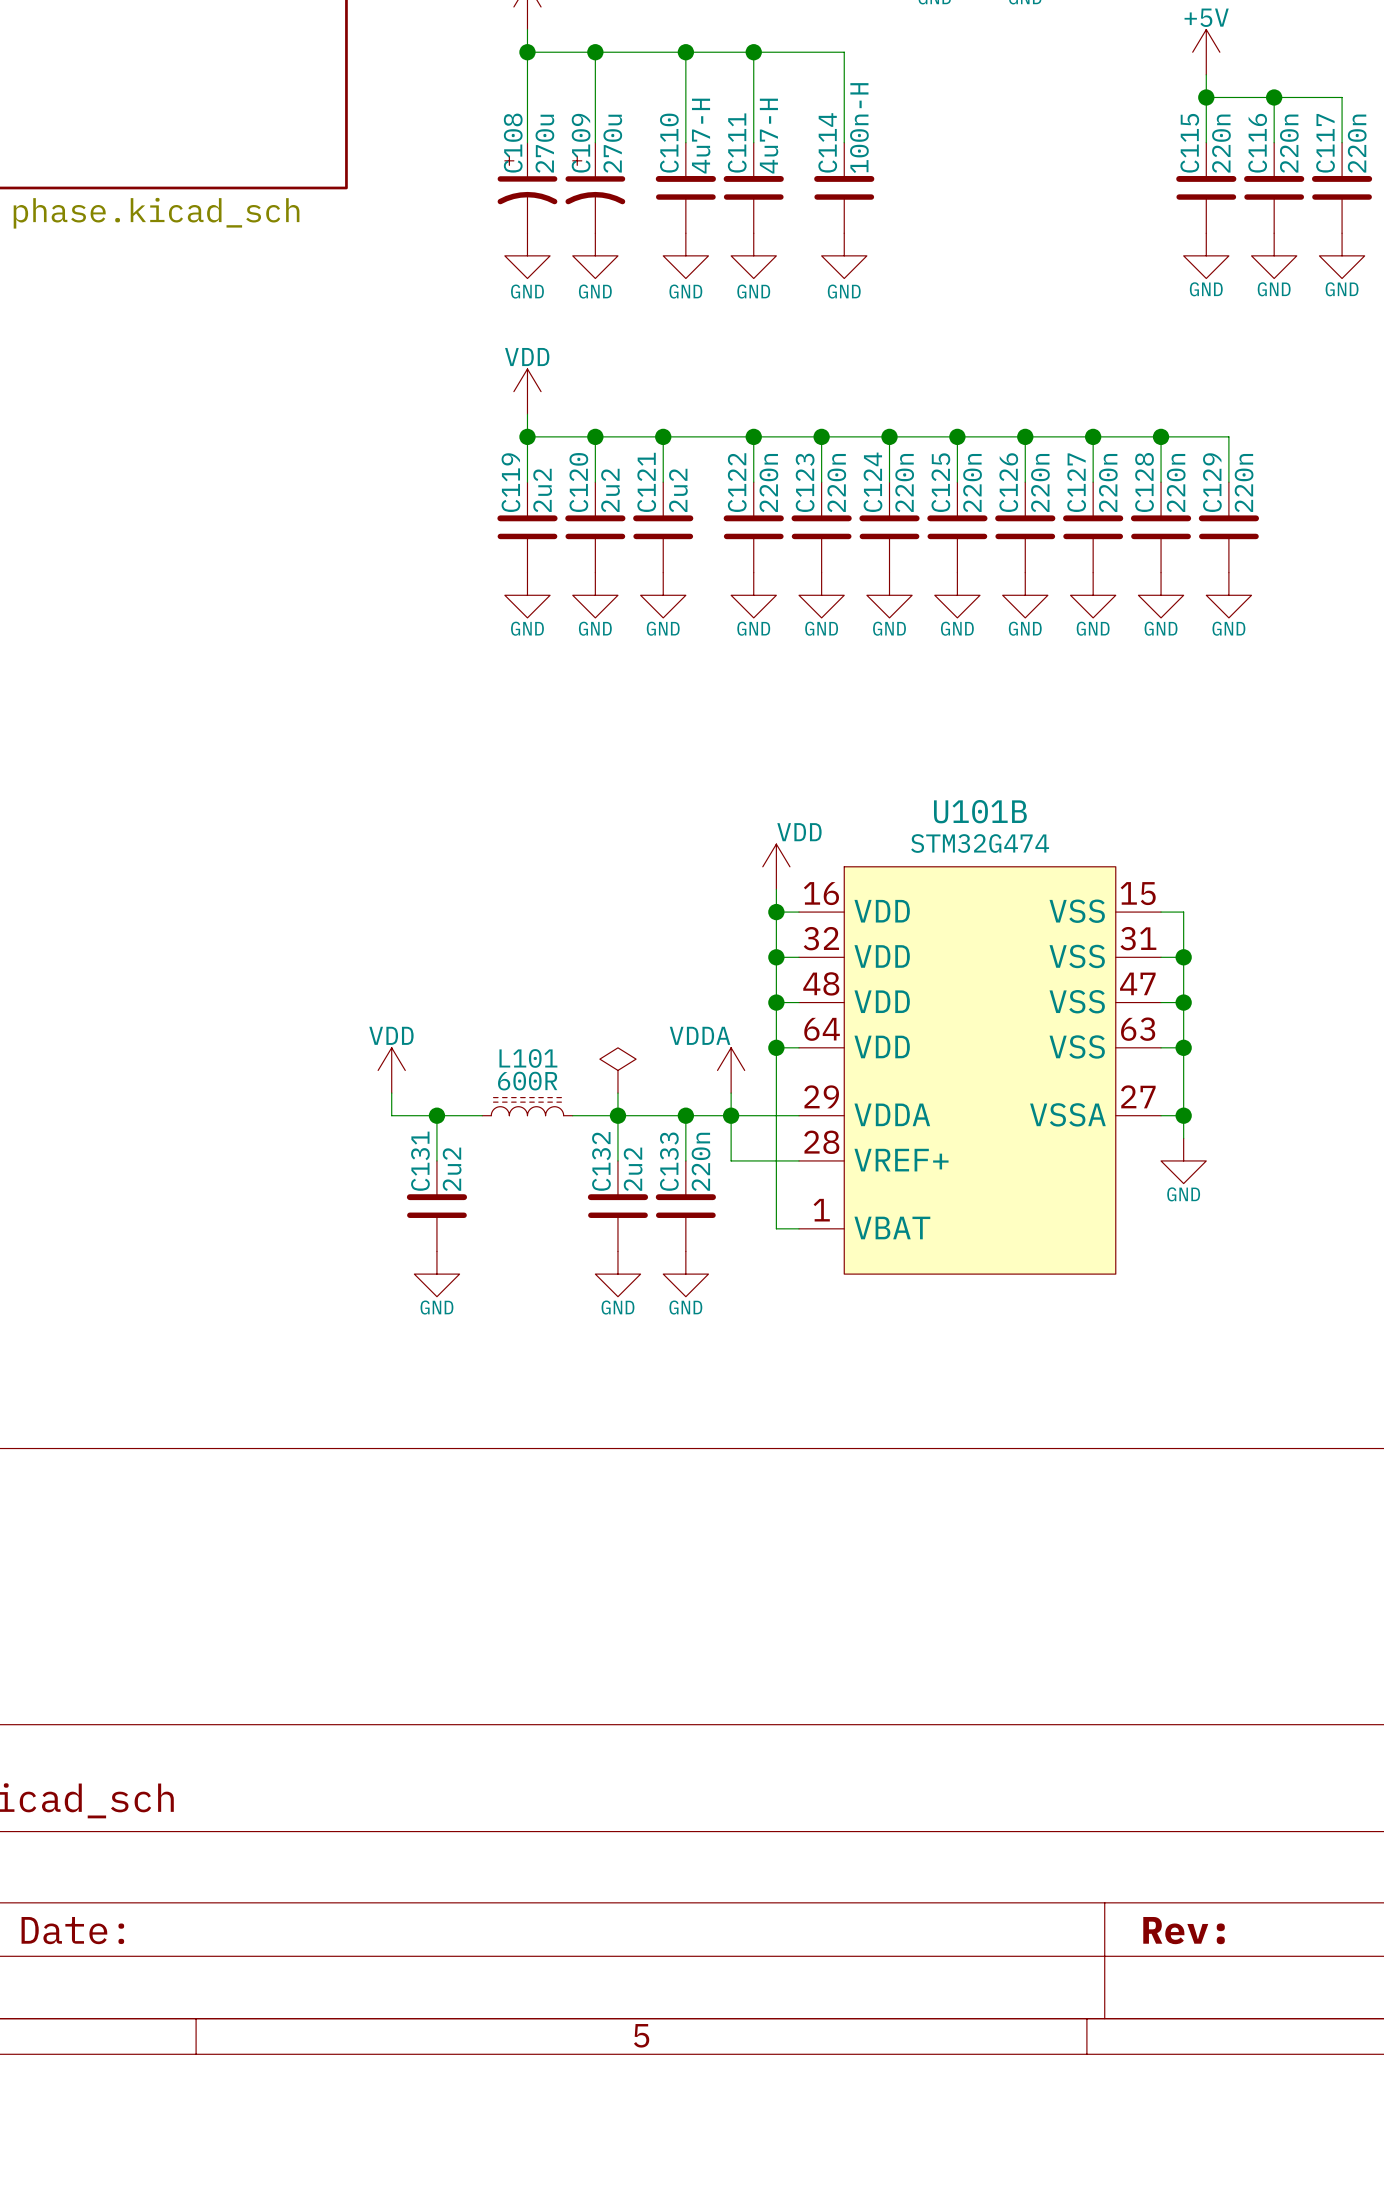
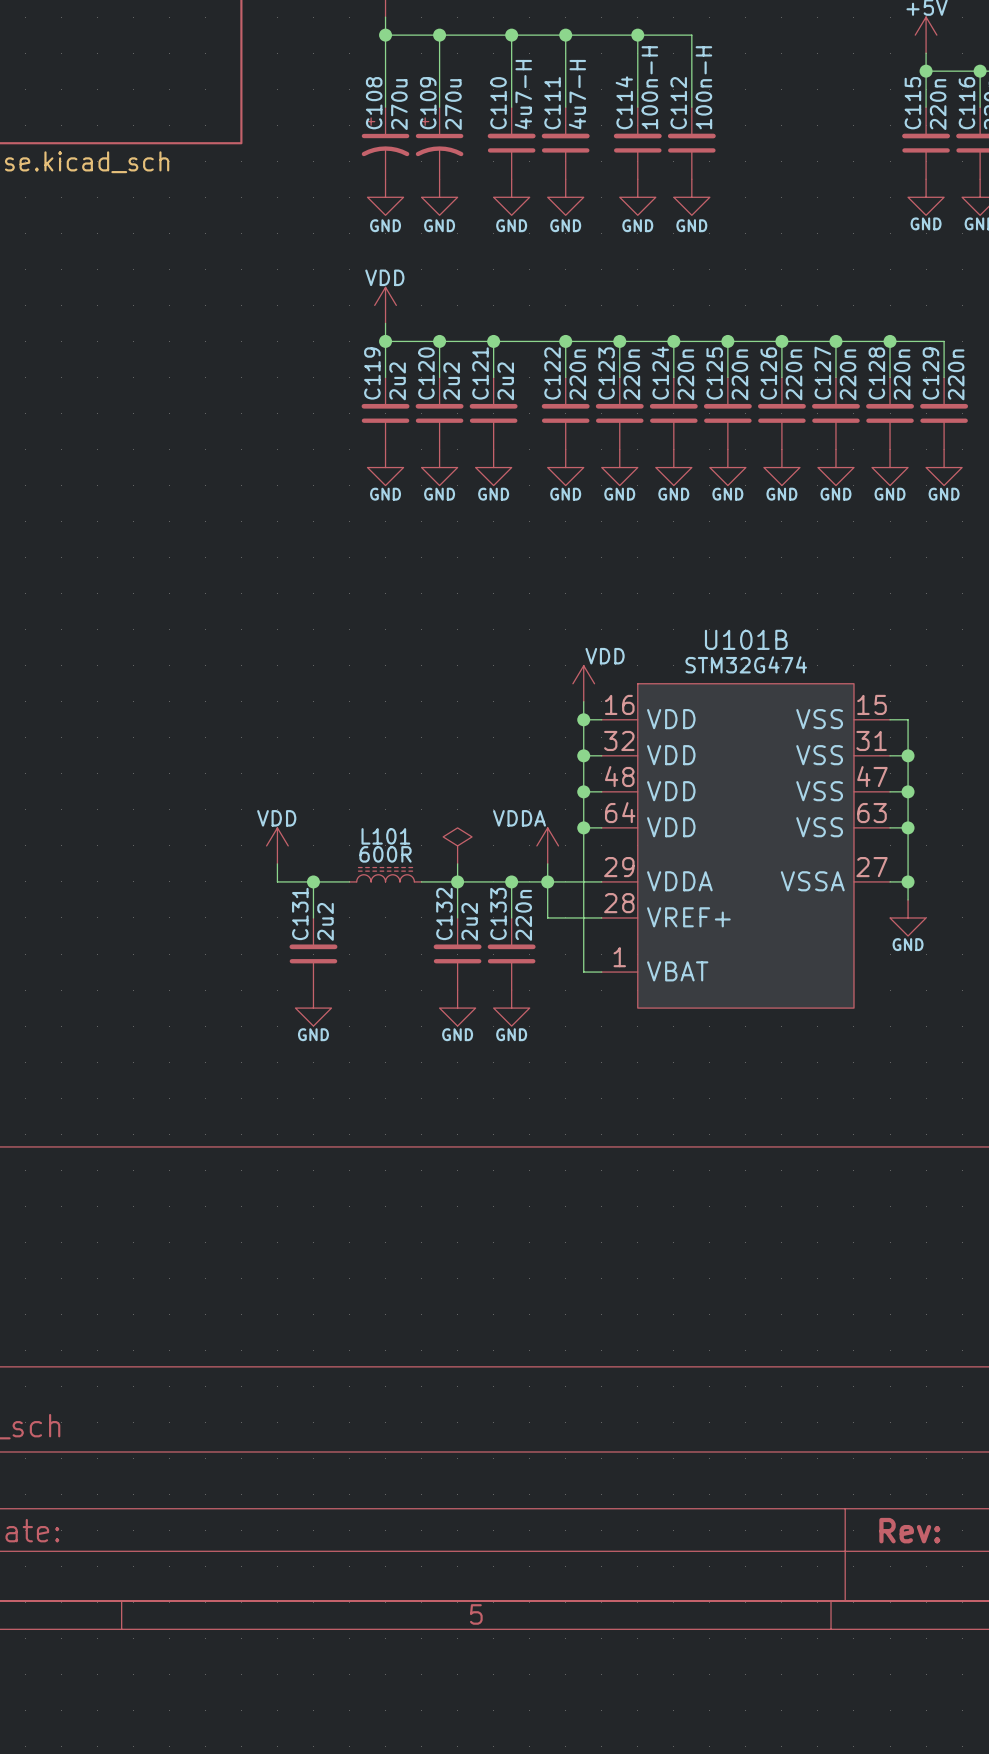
wire: none -> (637, 35) (691, 35) (691, 107)
junction: none -> (637, 35)
C112: none -> 100n-H (691, 143)
power symbol: none -> GND (691, 197)

